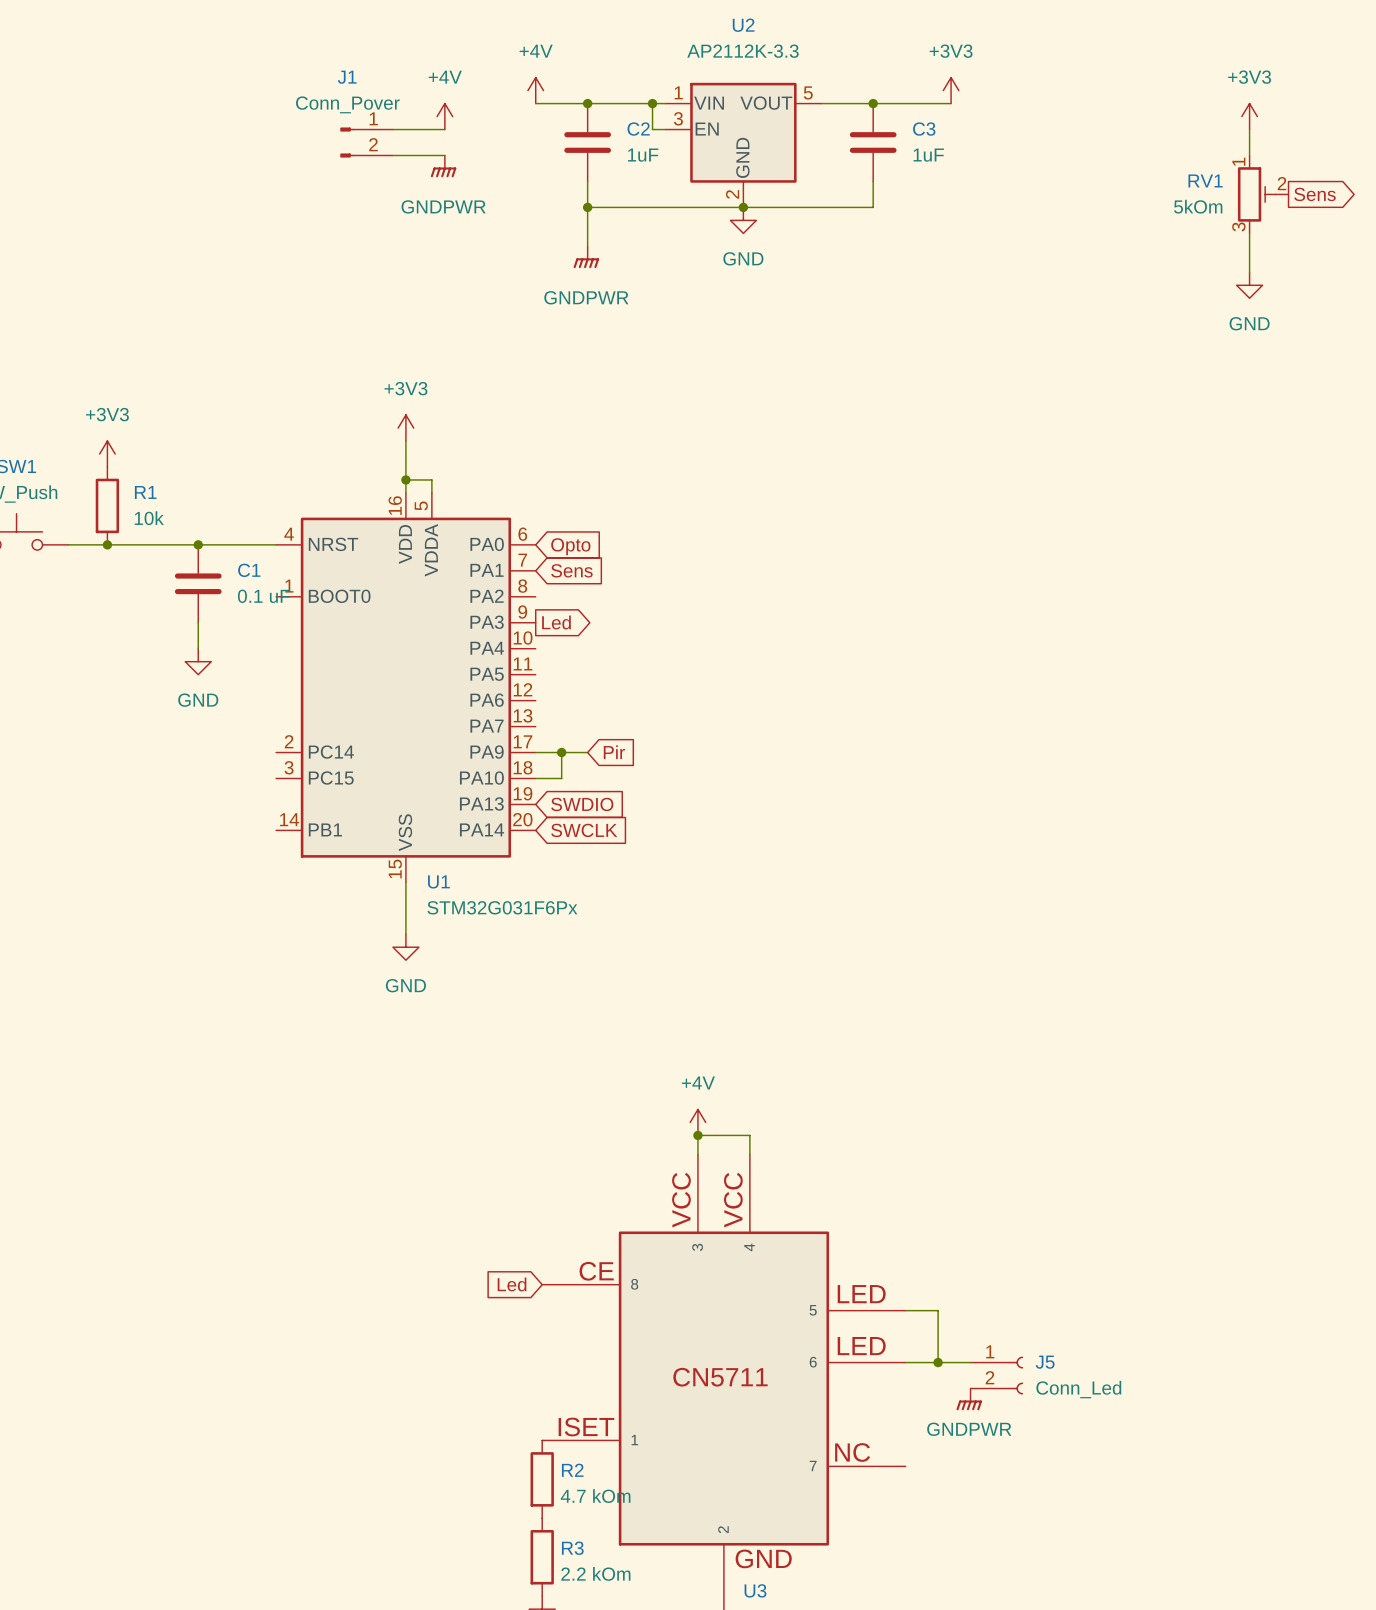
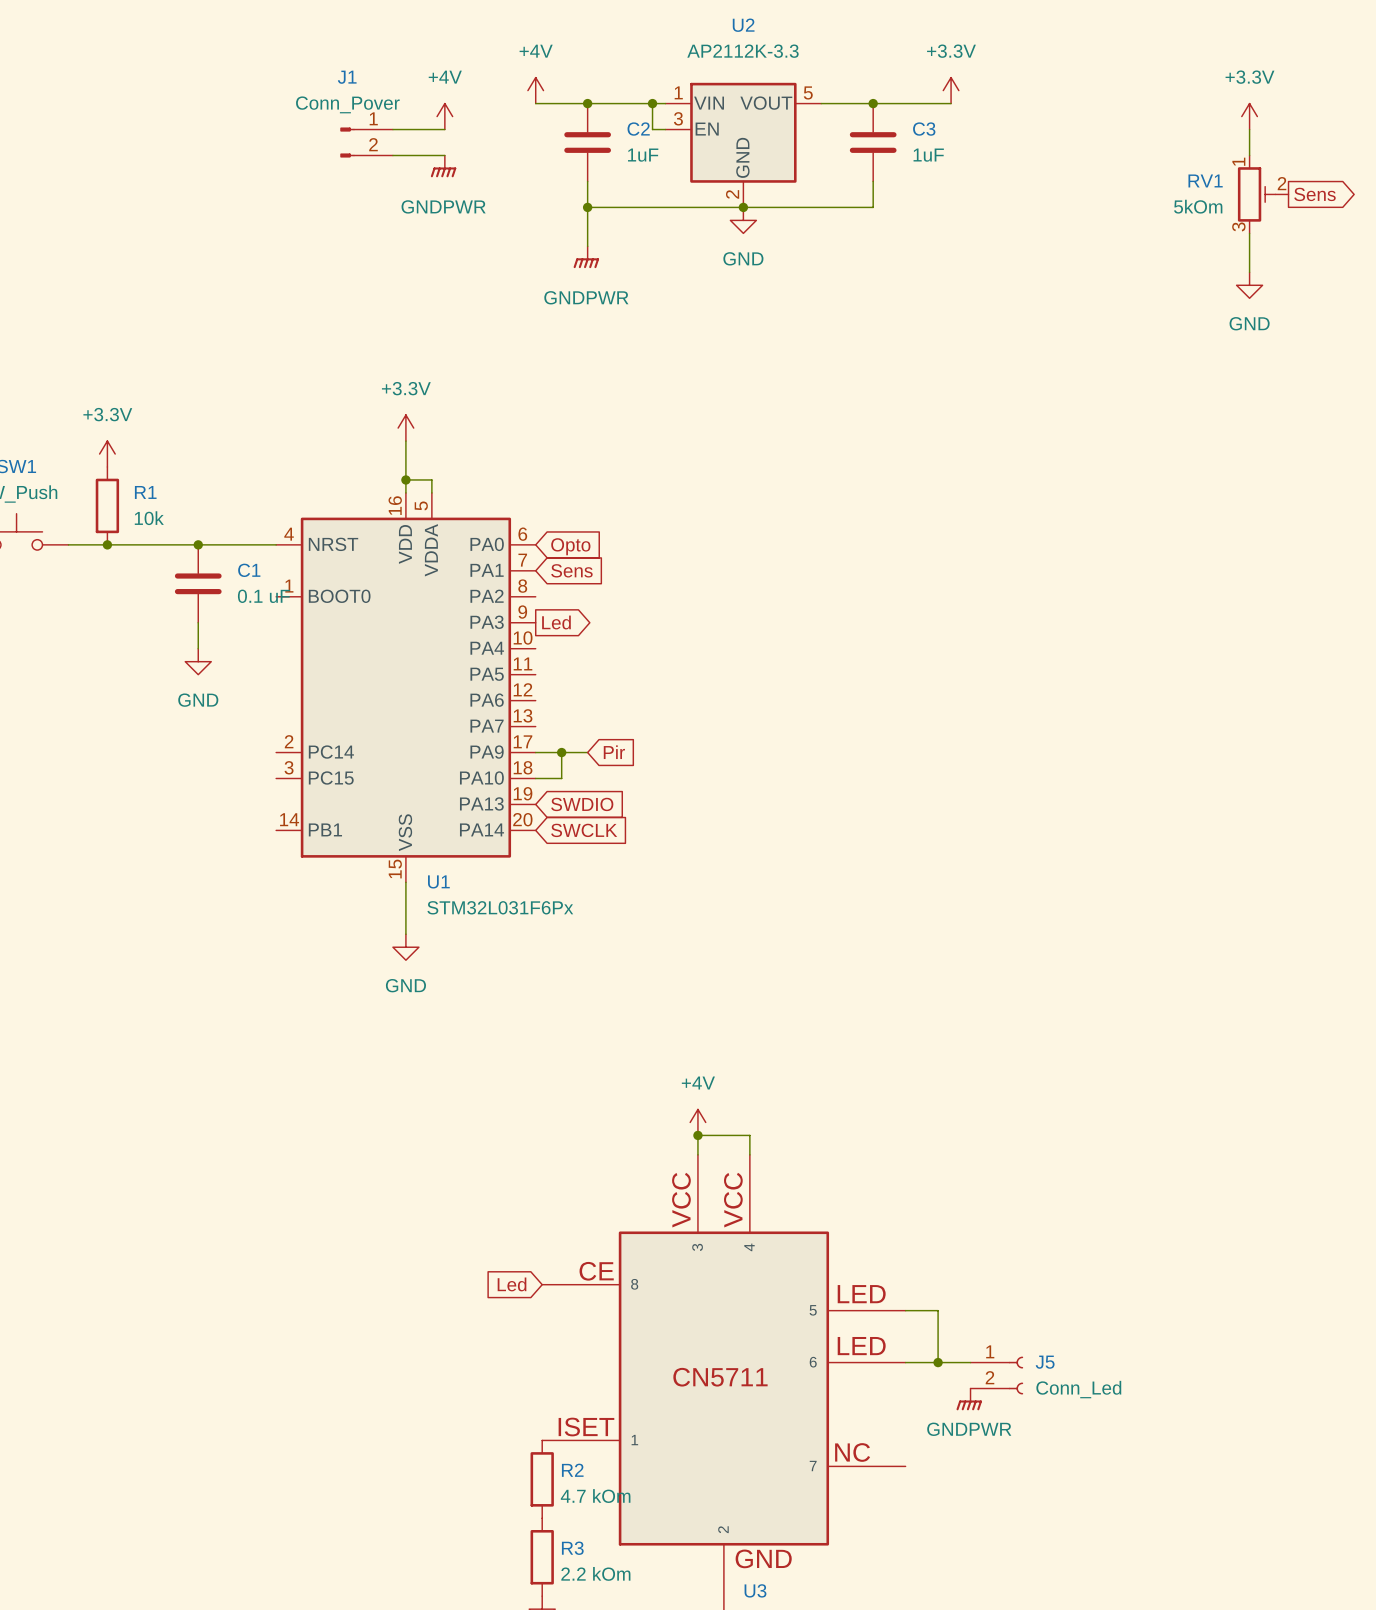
power symbol: +3V3 (951, 90) -> +3.3V (951, 90)
power symbol: +3V3 (1249, 116) -> +3.3V (1249, 116)
power symbol: +3V3 (405, 428) -> +3.3V (405, 428)
power symbol: +3V3 (107, 454) -> +3.3V (107, 454)
U1 value: STM32G031F6Px (502, 907) -> STM32L031F6Px (500, 907)

